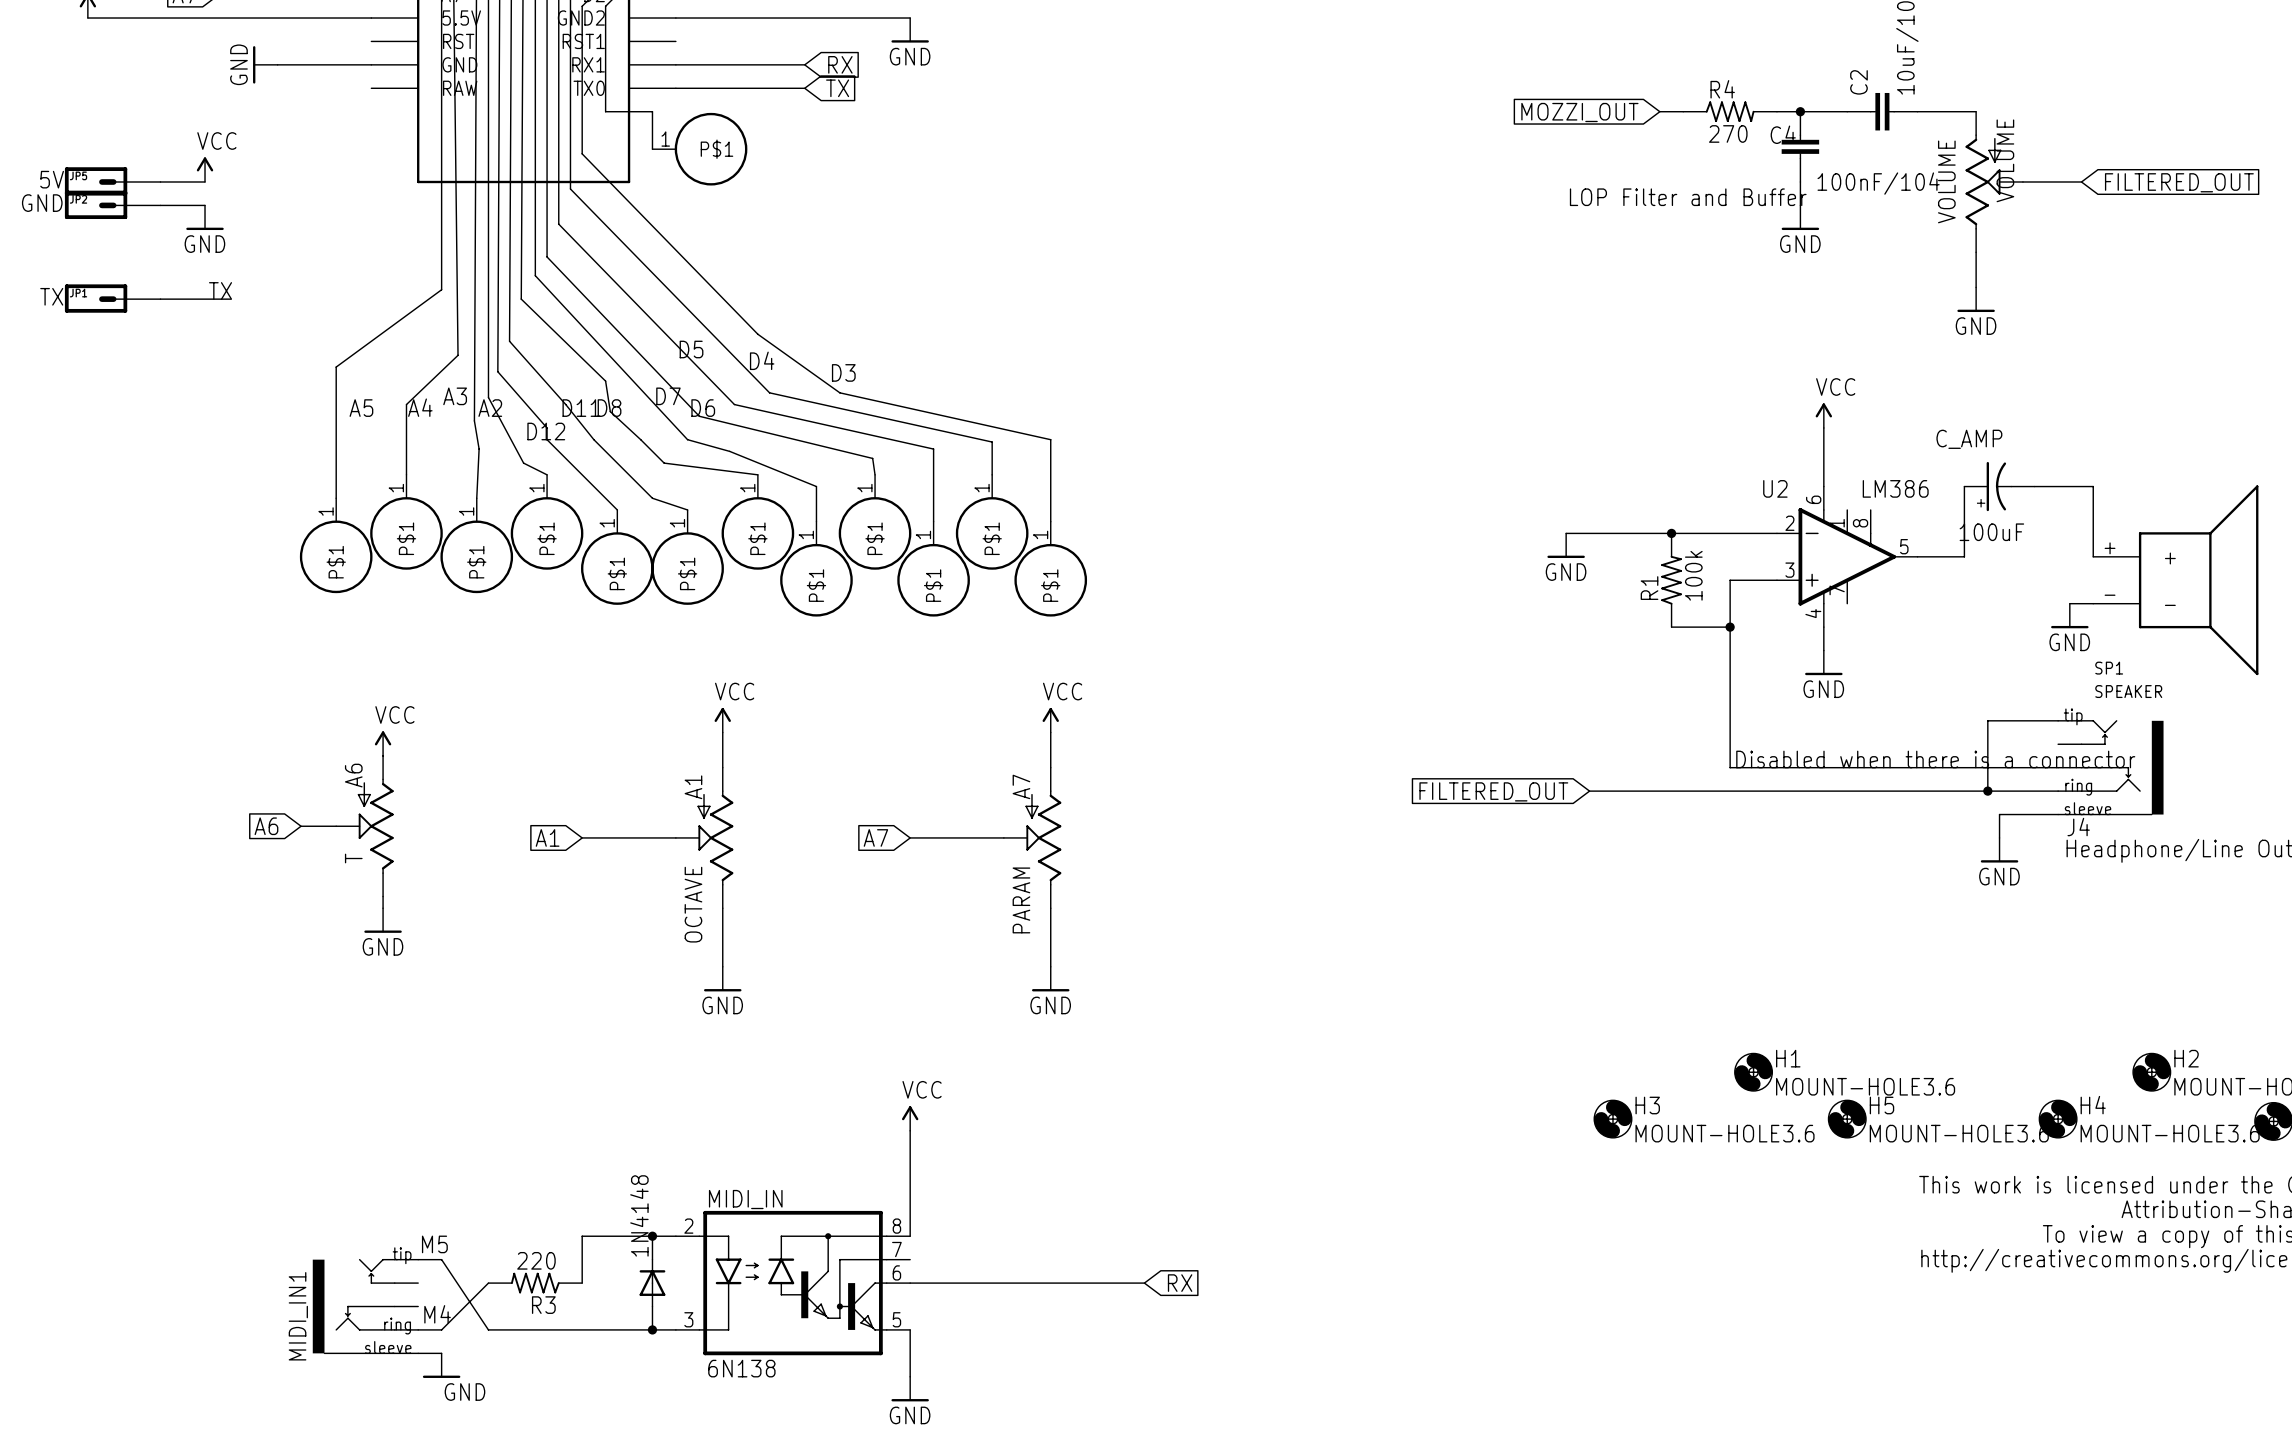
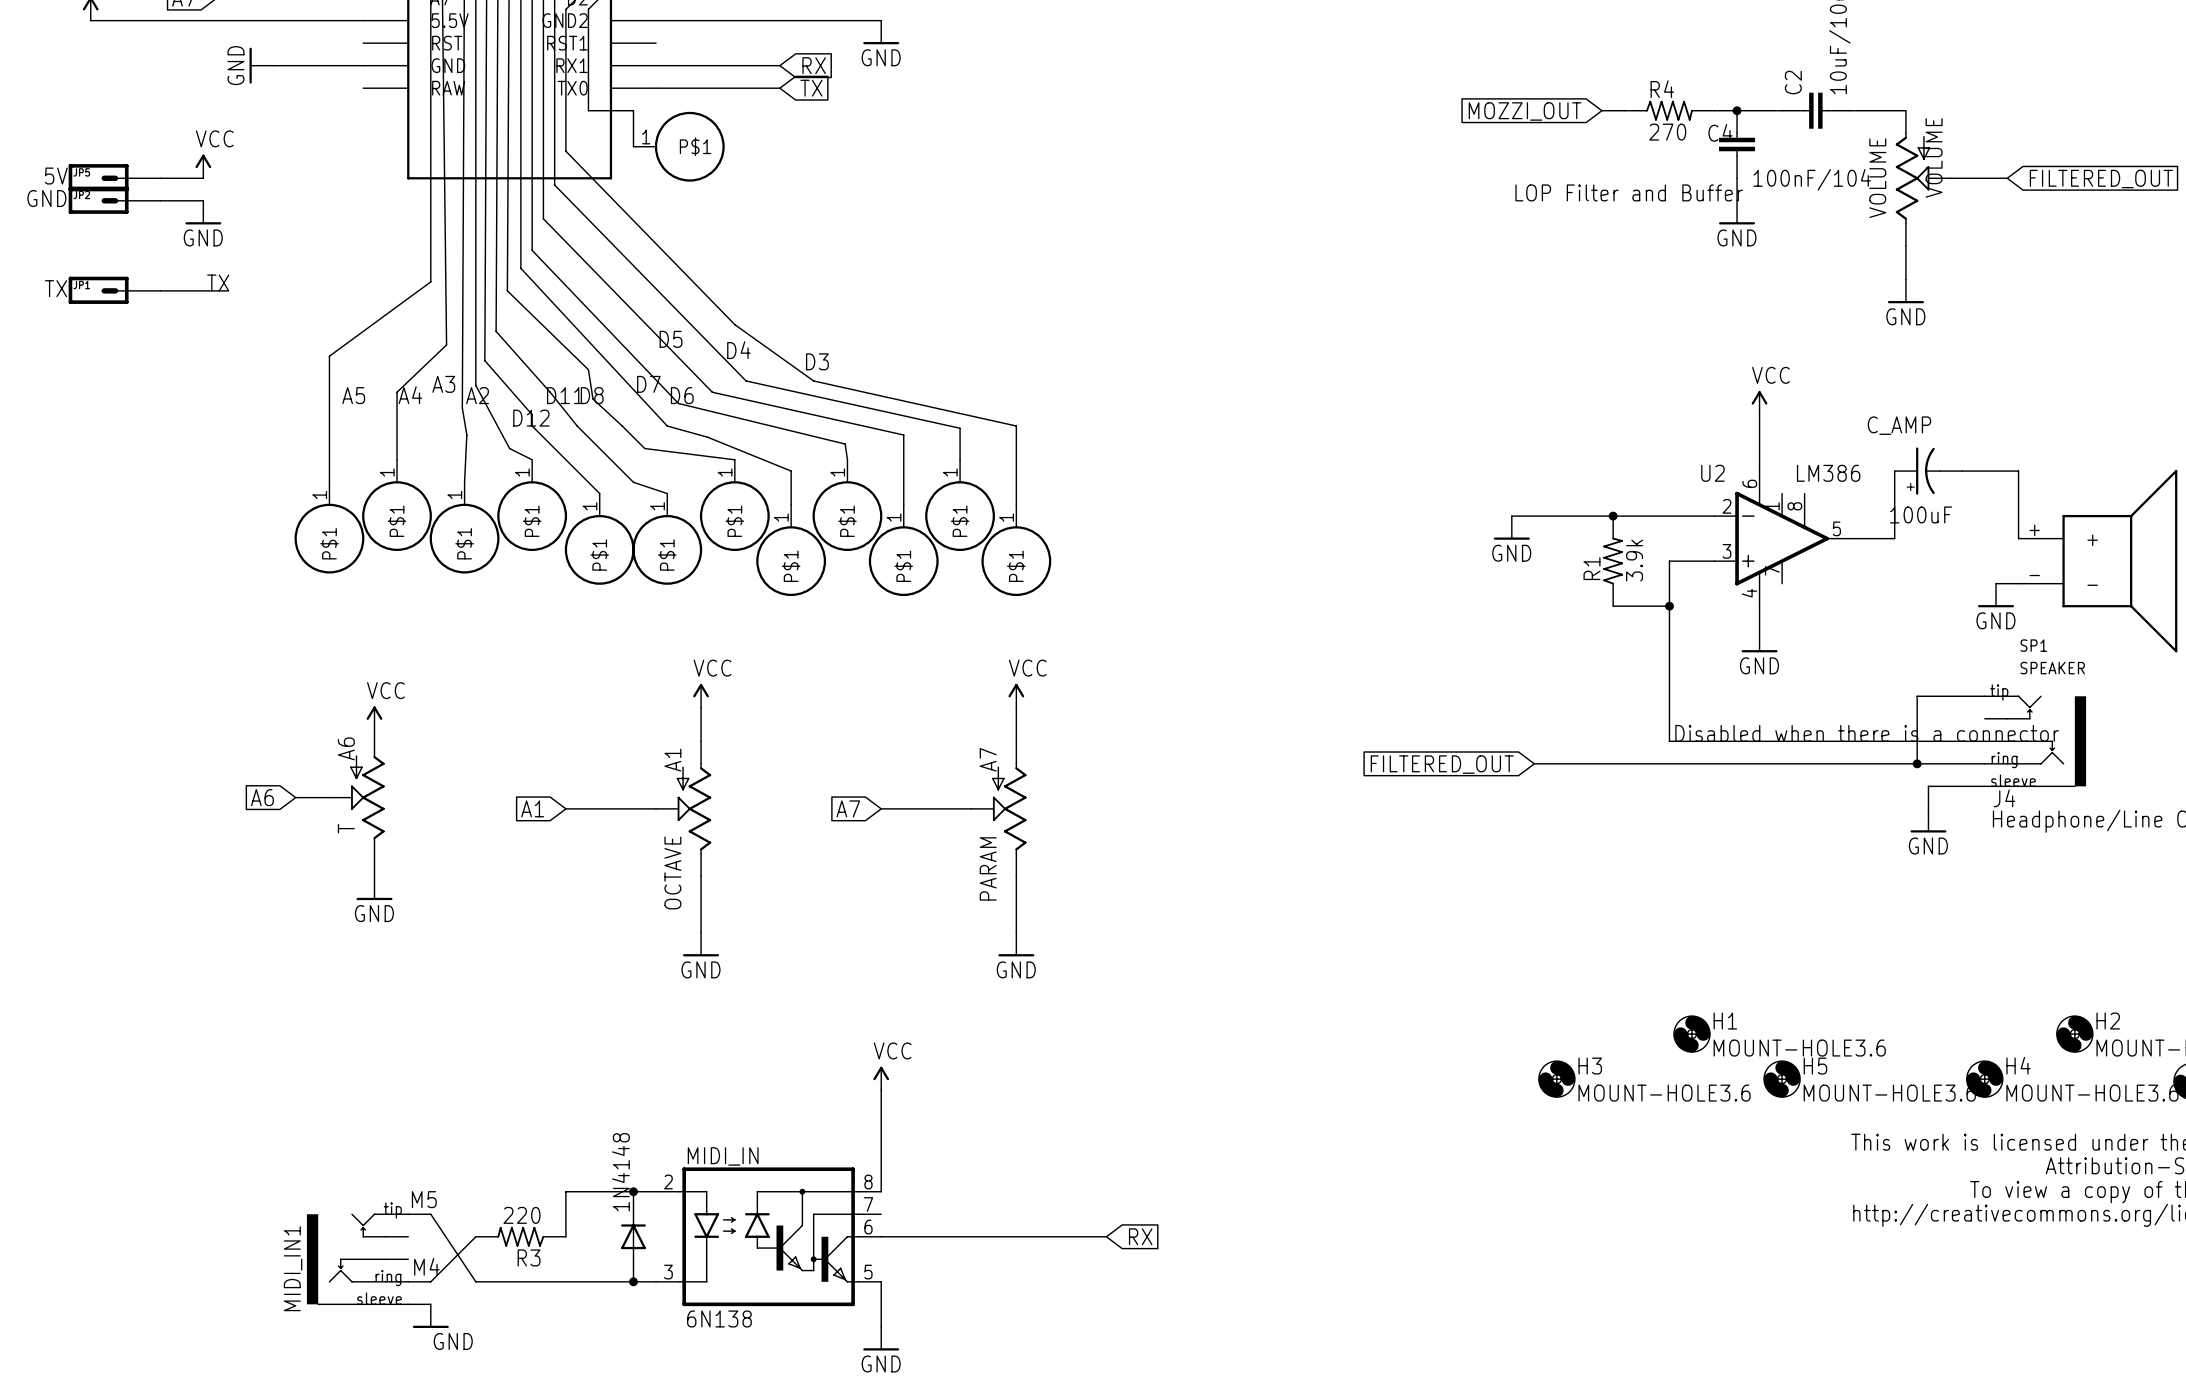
R1 value: 100k (1693, 575) -> 3.9k (1634, 560)

